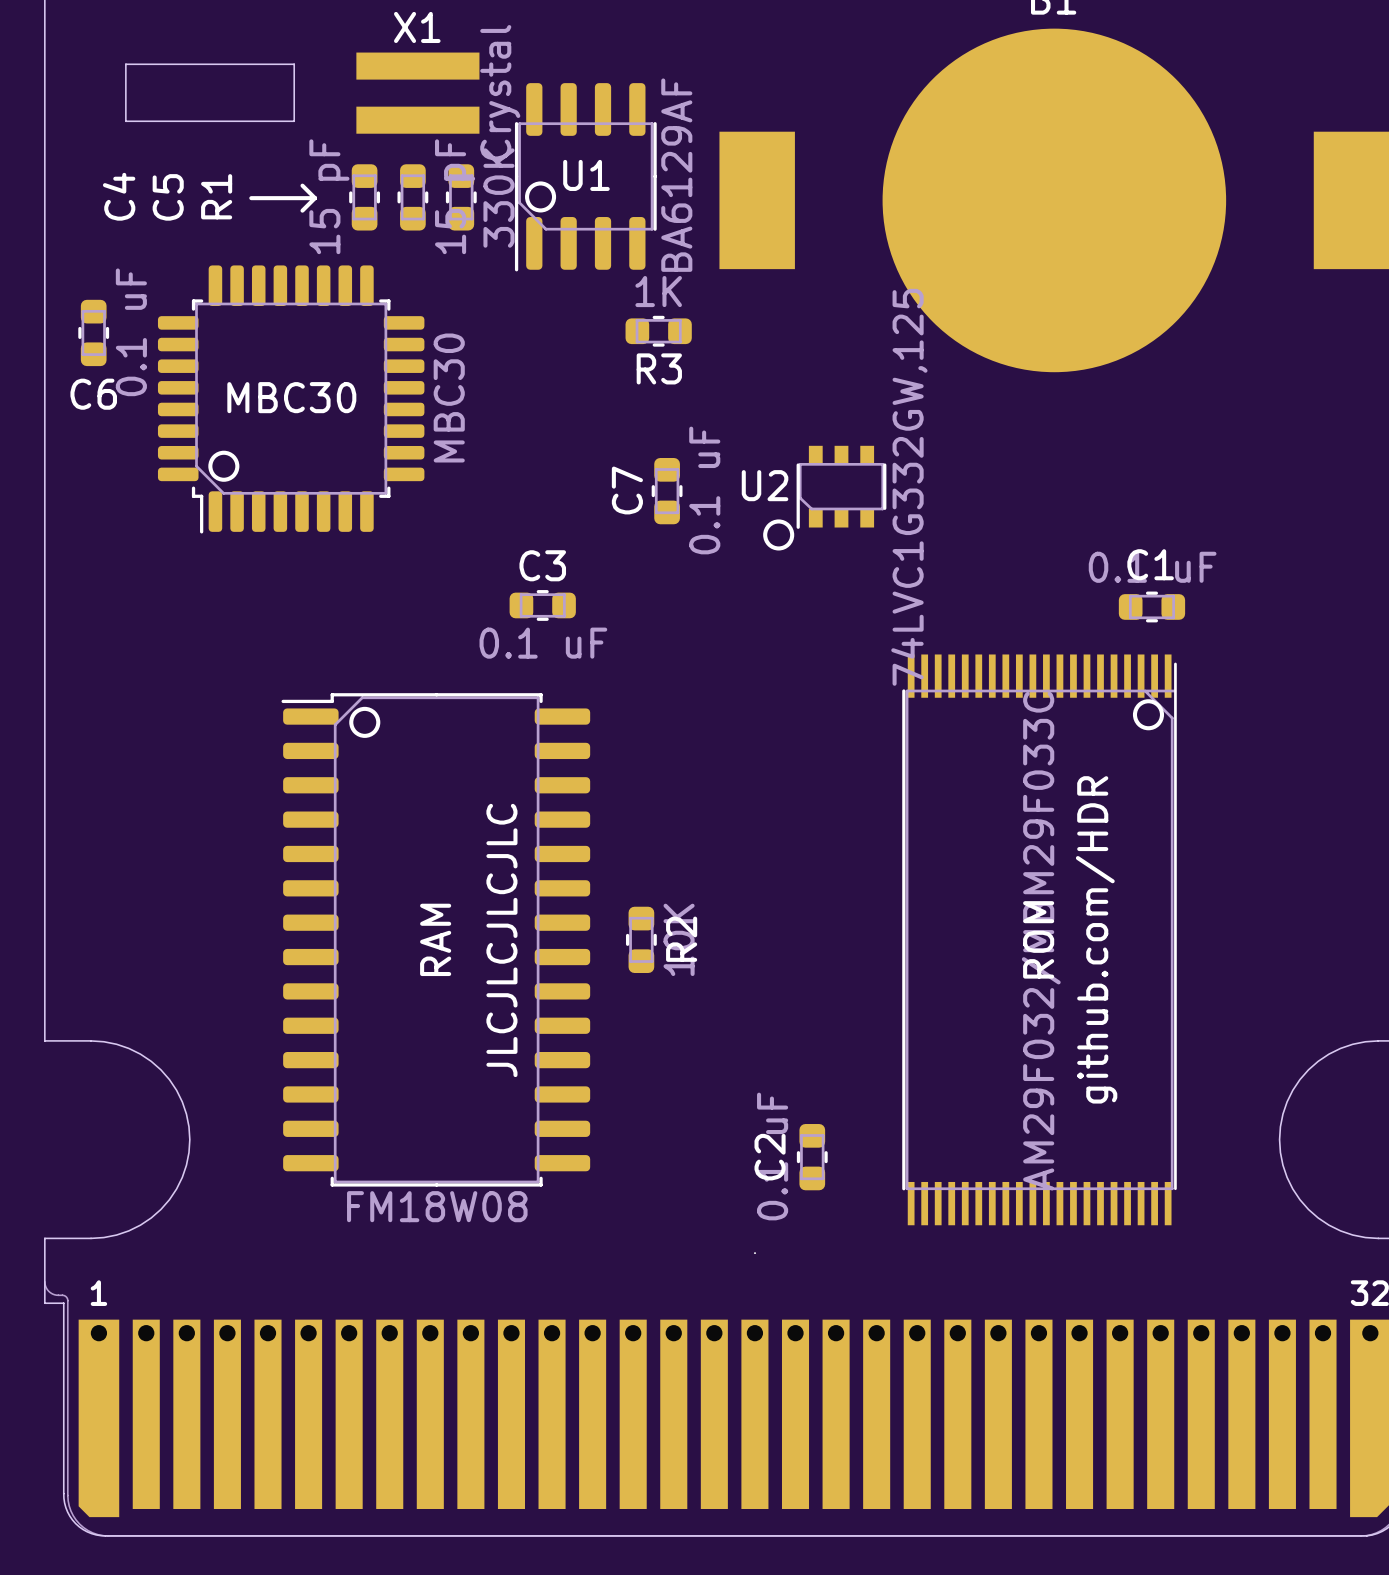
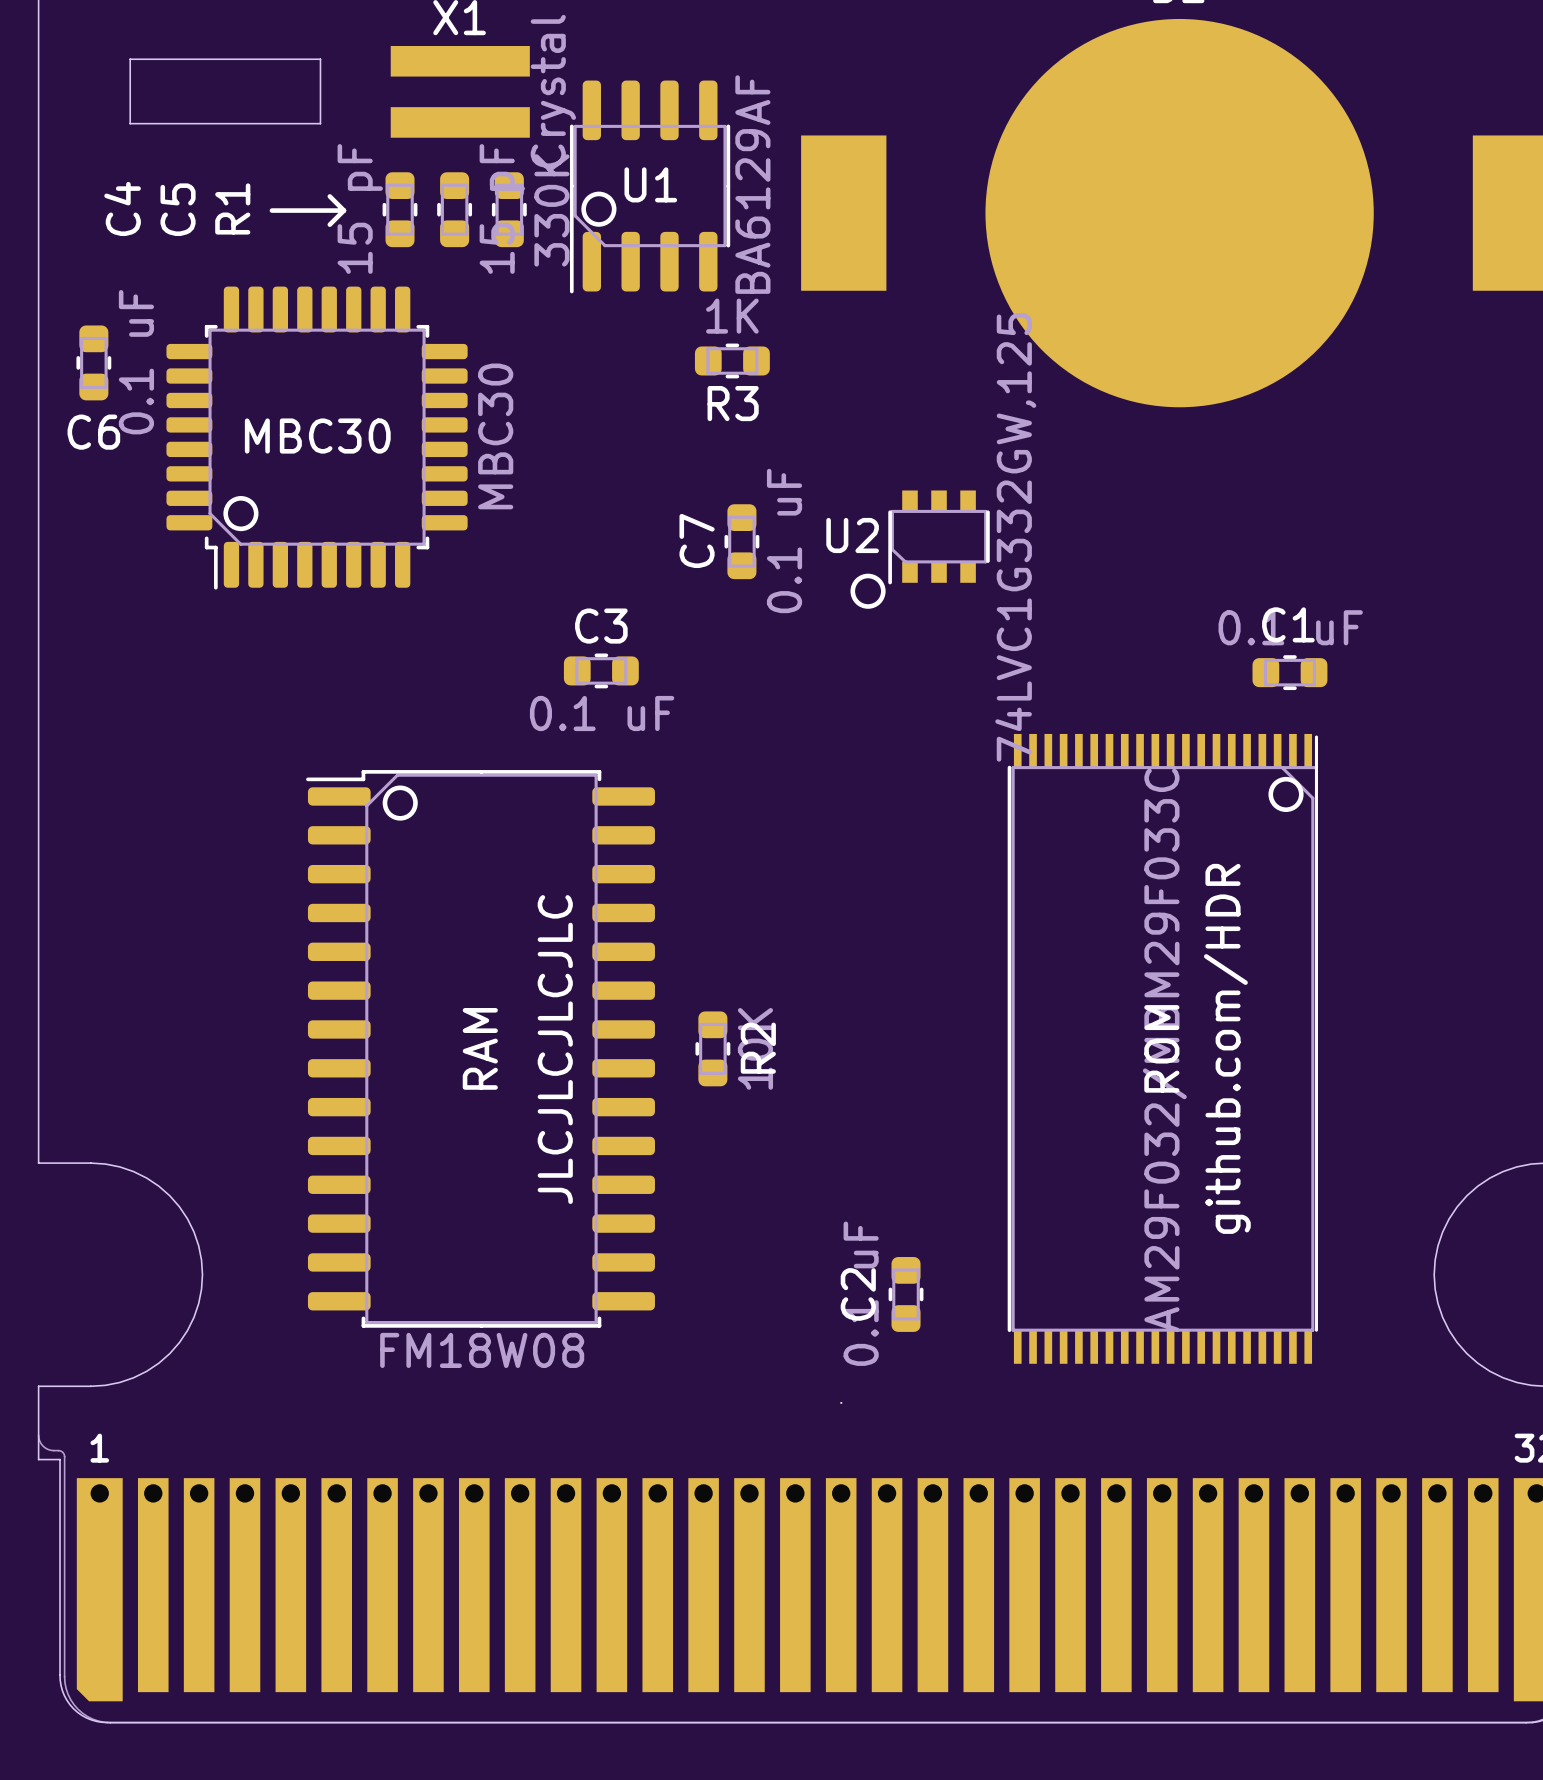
ROM footprint: [902, 654, 1177, 1226] -> [1007, 733, 1319, 1364]

